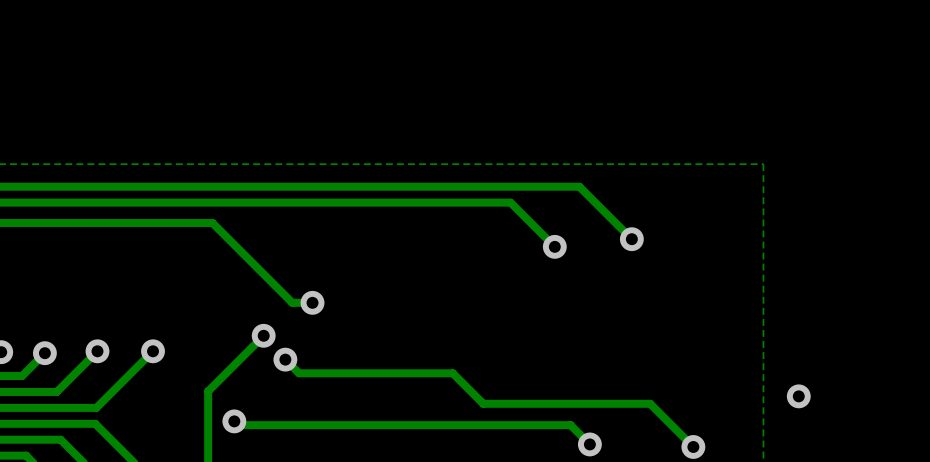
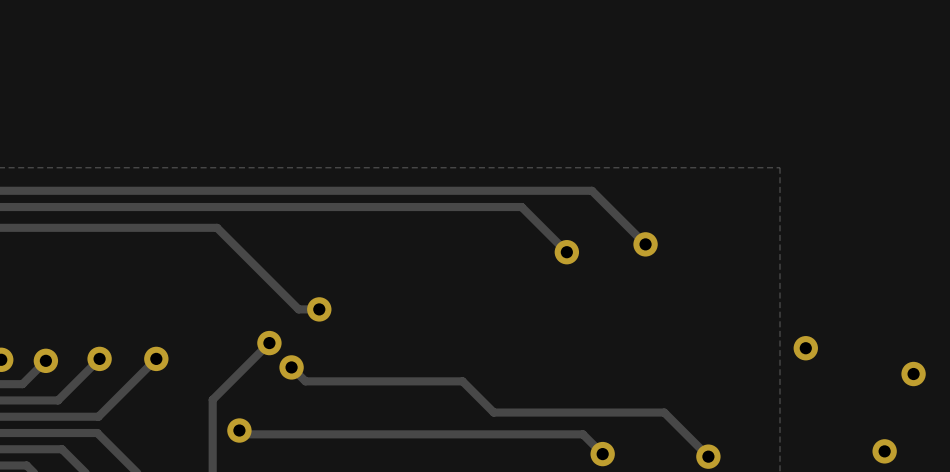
via: none -> (805, 348)
via: none -> (913, 374)
via: (798, 396) -> none
via: none -> (884, 451)

